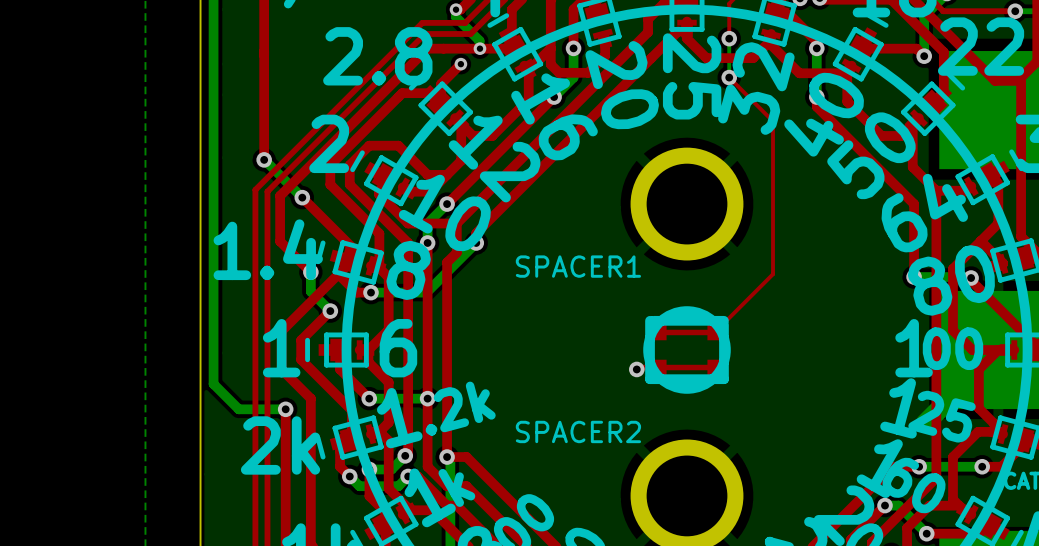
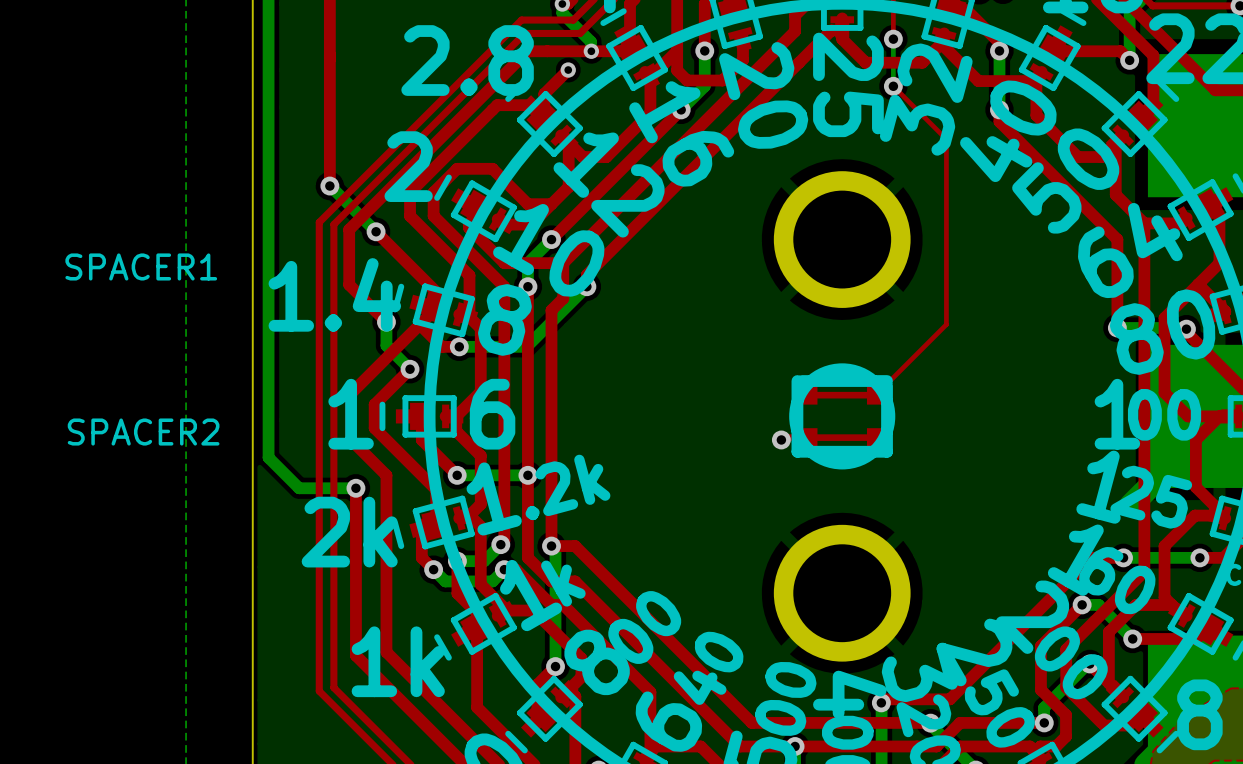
SPACER1 name position: SPACER1 (578, 266) -> SPACER1 (141, 266)
SPACER2 name position: SPACER2 (578, 431) -> SPACER2 (143, 432)

